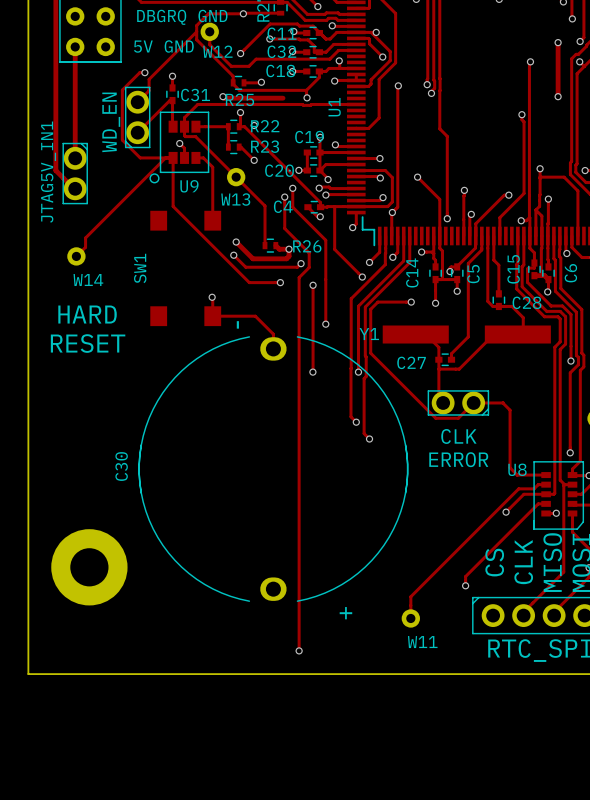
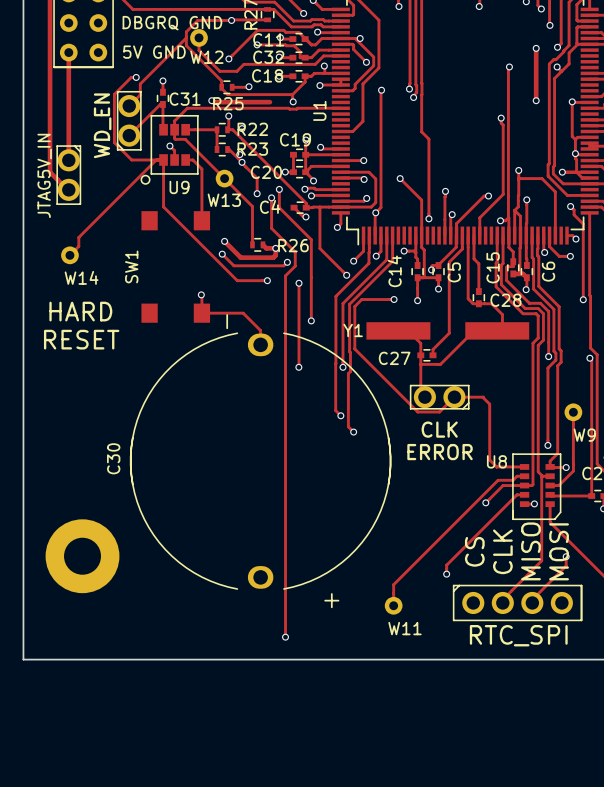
via: none -> (239, 154)
track: none -> (242, 163) (257, 178) (257, 193)
JTAG5V_IN1 name: JTAG5V_IN1 (48, 172) -> JTAG5V_IN (44, 175)
via: none -> (257, 193)

